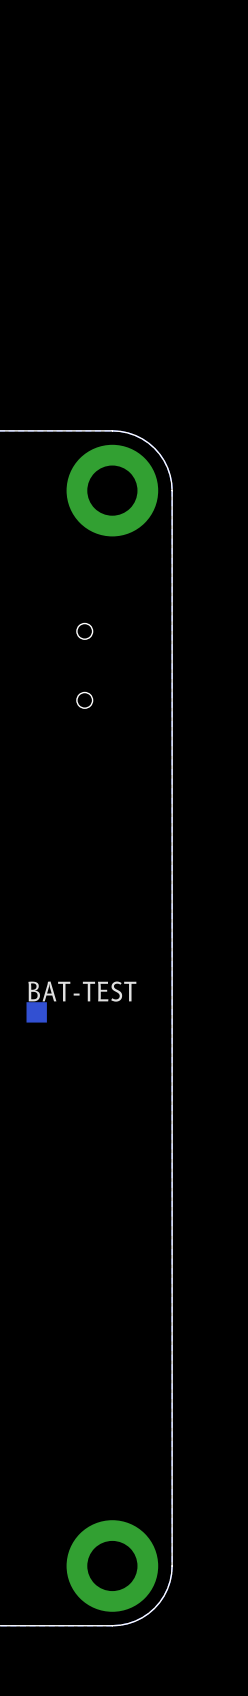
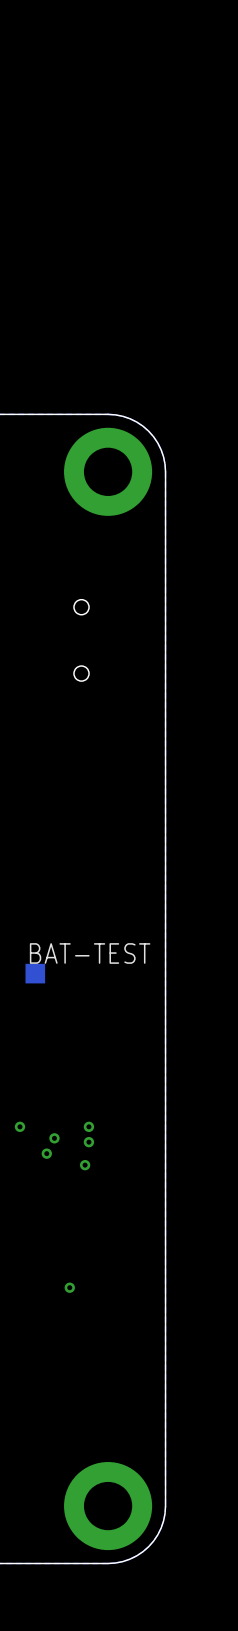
via: none -> (19, 1126)
via: none -> (88, 1126)
via: none -> (54, 1138)
via: none -> (88, 1142)
via: none -> (46, 1153)
via: none -> (85, 1165)
via: none -> (69, 1287)

